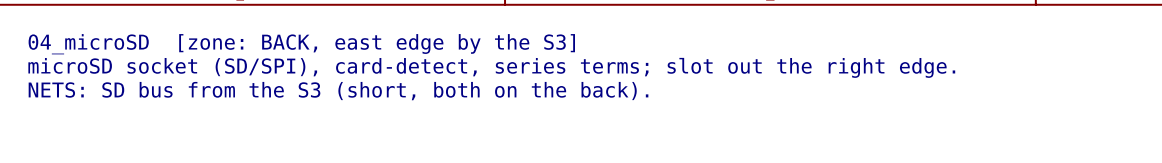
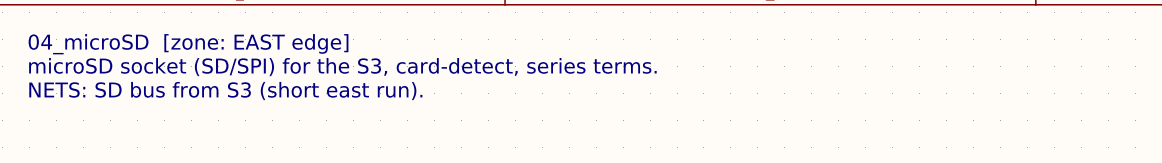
text: 04_microSD [zone: BACK, east edge by the S3] (301, 44) -> 04_microSD [zone: EAST edge] (188, 44)
text: microSD socket (SD/SPI), card-detect, series terms; slot out the right edge. (491, 67) -> microSD socket (SD/SPI) for the S3, card-detect, series terms. (342, 67)
text: NETS: SD bus from the S3 (short, both on the back). (338, 91) -> NETS: SD bus from S3 (short east run). (225, 91)

